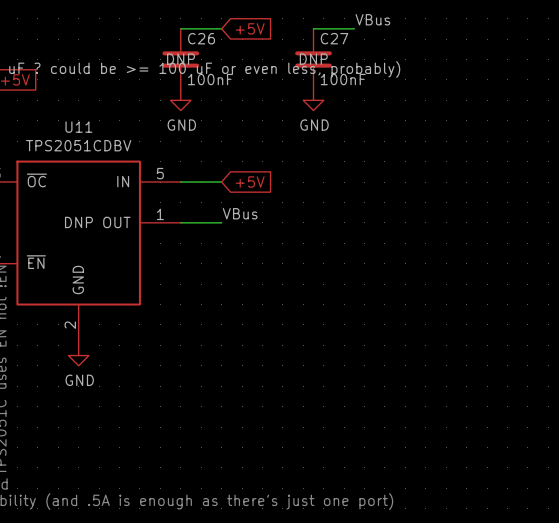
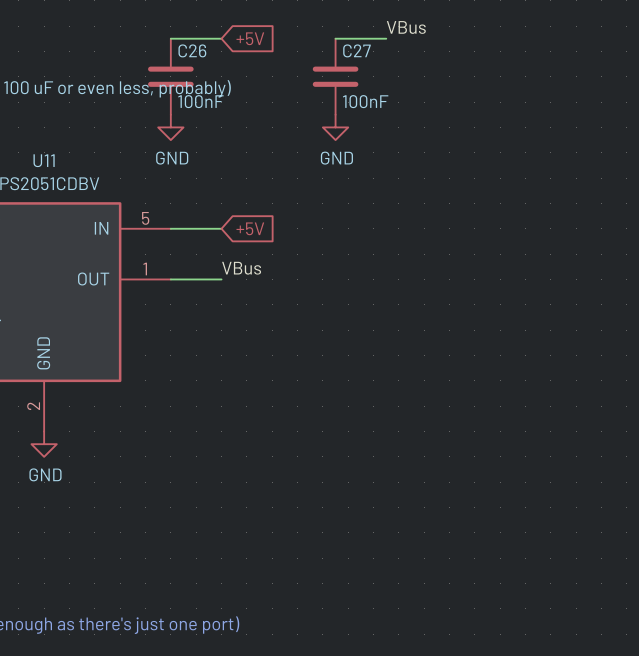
C26 text: DNP (181, 59) -> none
C27 text: DNP (313, 59) -> none
U11 text: DNP (78, 222) -> none

